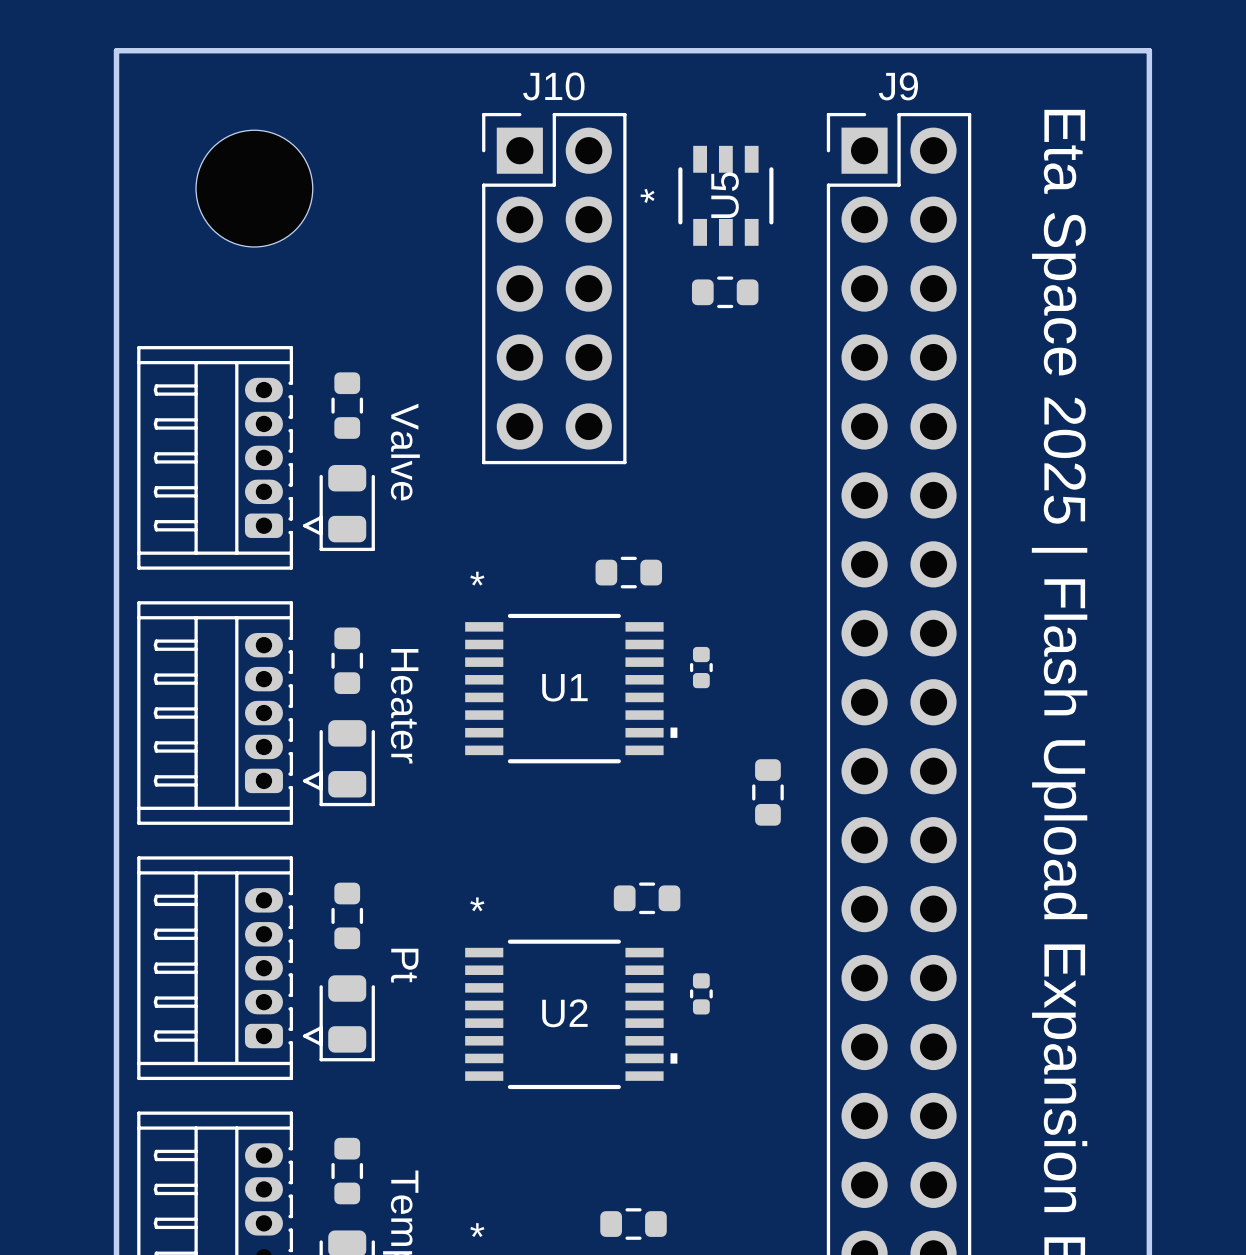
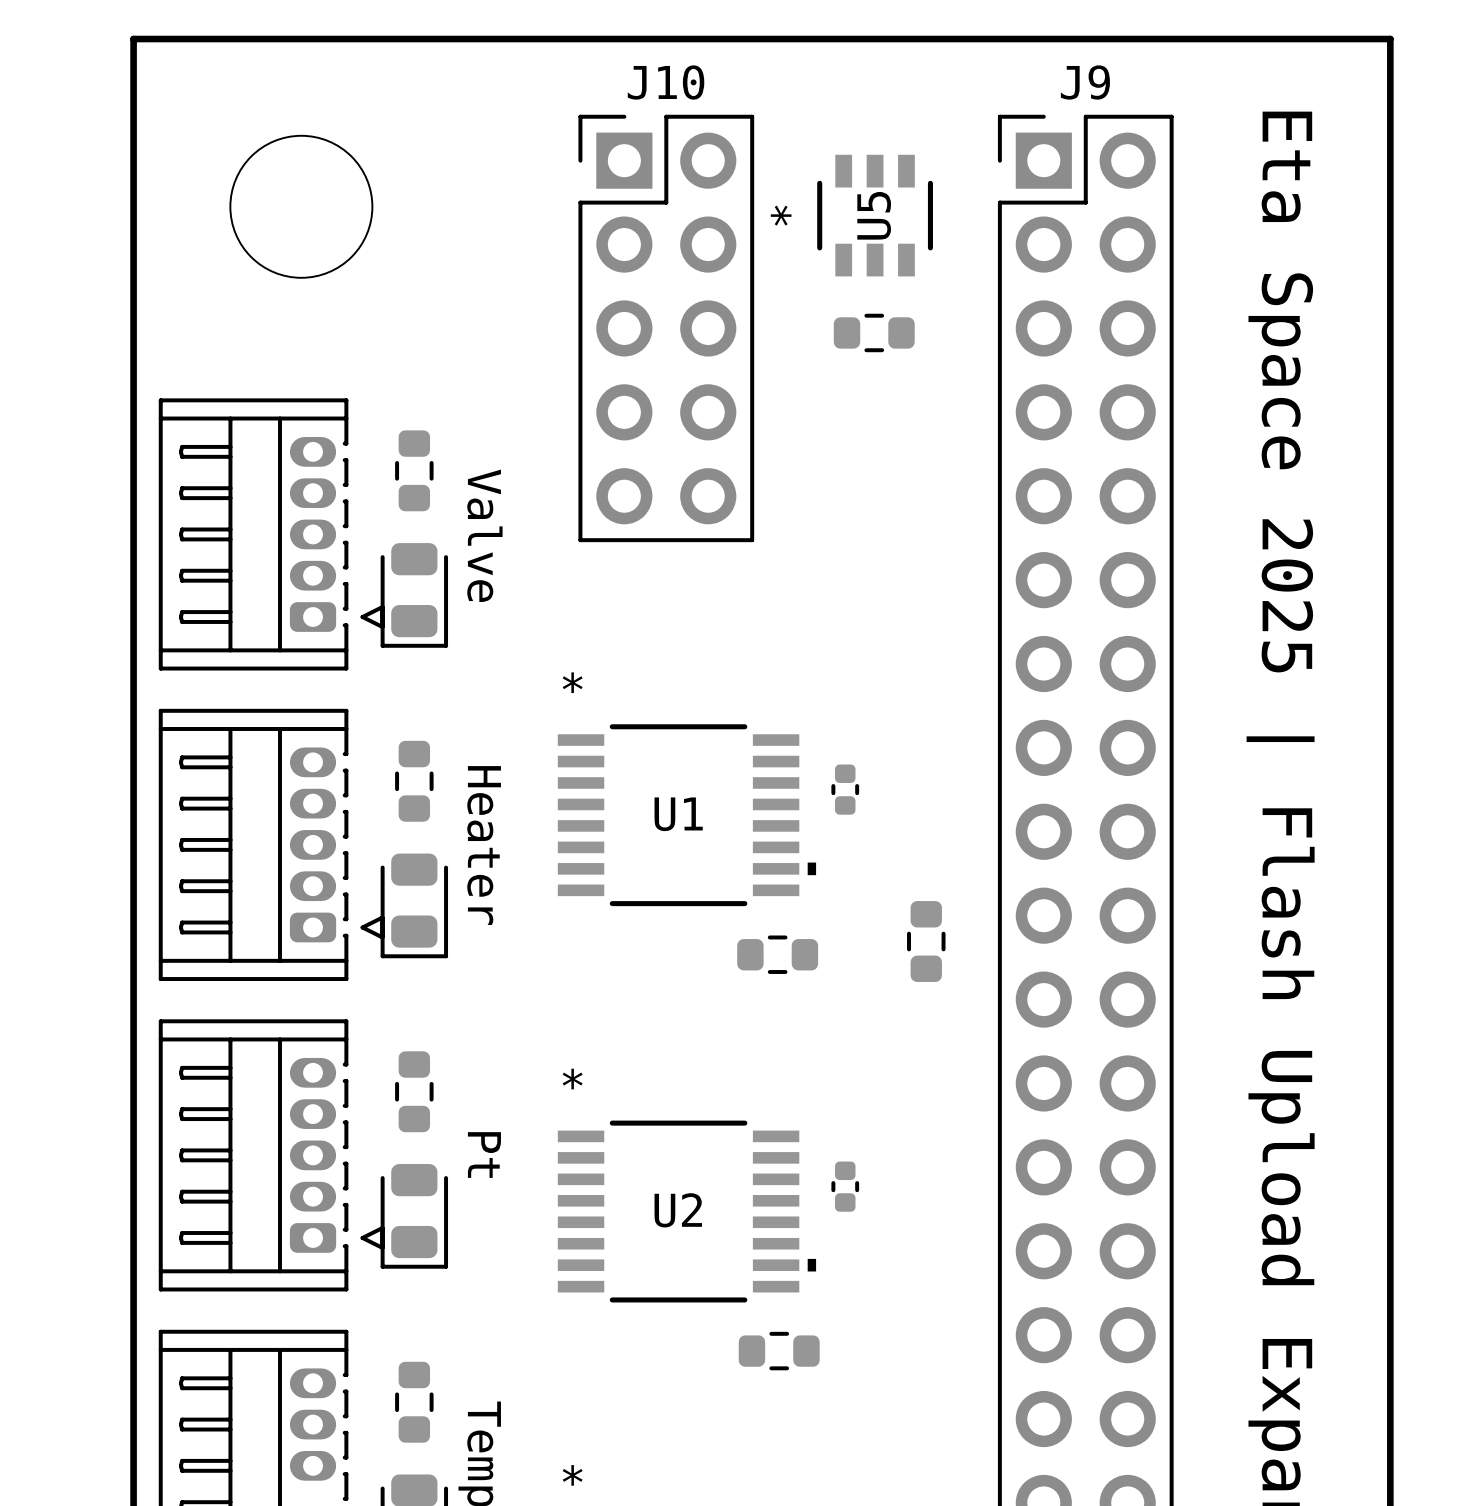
part: (628, 572) -> none
part position: (647, 898) -> (777, 954)
part position: (633, 1224) -> (779, 1351)

